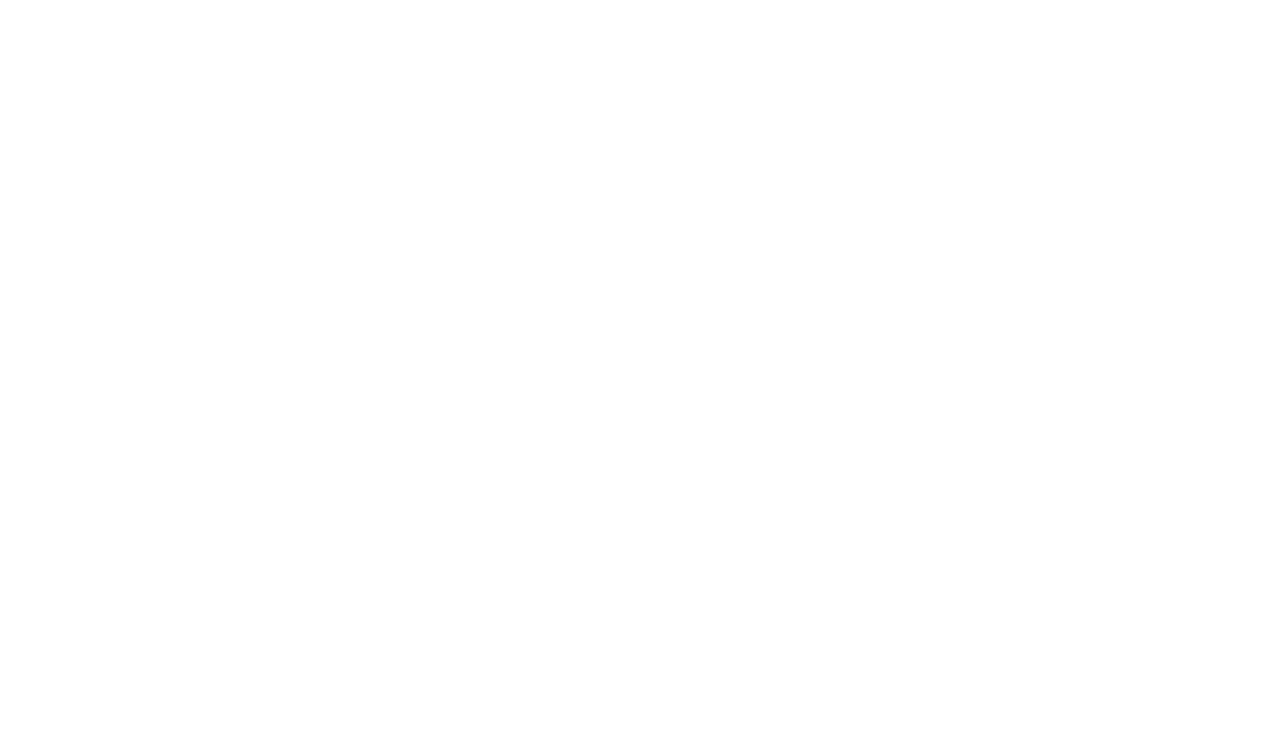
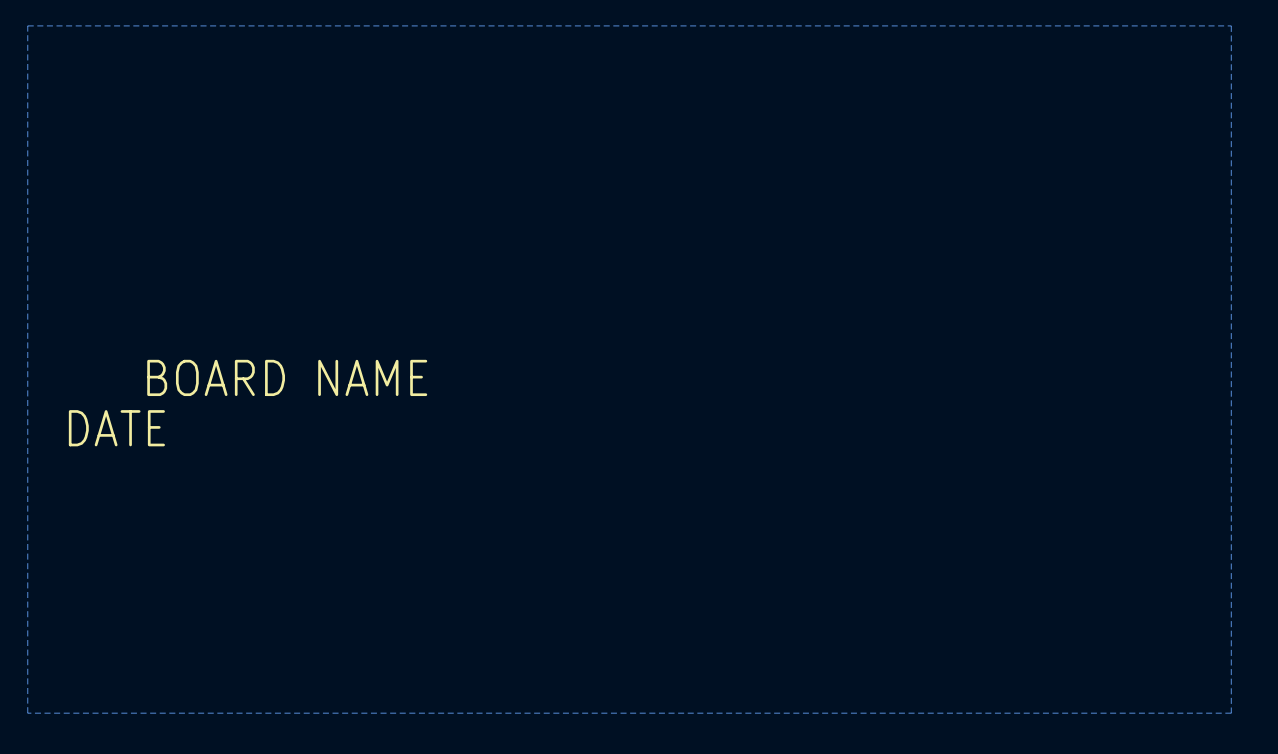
zone outline: none -> (1231, 25) (1231, 713) (27, 713) (27, 25) (1231, 25)
text: none -> BOARD NAME (287, 377)
text: none -> DATE (116, 428)

